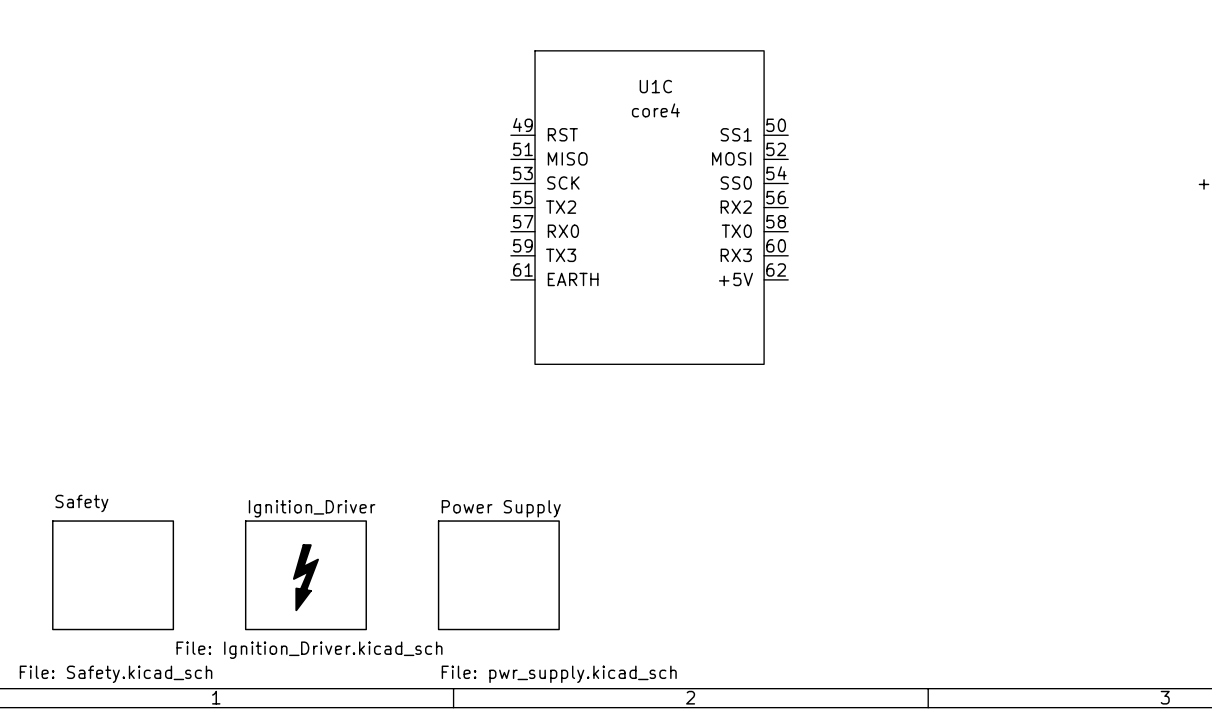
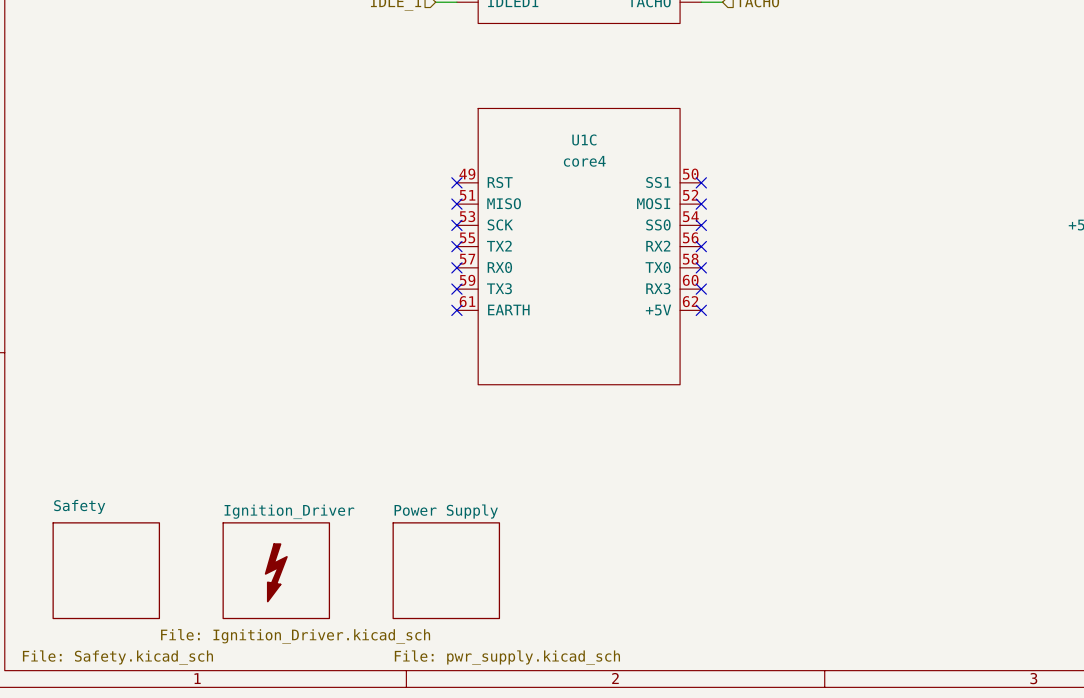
no-connect mark: none -> (456, 182)
no-connect mark: none -> (701, 182)
no-connect mark: none -> (456, 204)
no-connect mark: none -> (701, 204)
no-connect mark: none -> (456, 225)
no-connect mark: none -> (701, 225)
no-connect mark: none -> (456, 246)
no-connect mark: none -> (701, 246)
no-connect mark: none -> (456, 267)
no-connect mark: none -> (701, 267)
no-connect mark: none -> (456, 289)
no-connect mark: none -> (701, 289)
no-connect mark: none -> (456, 310)
no-connect mark: none -> (701, 310)

